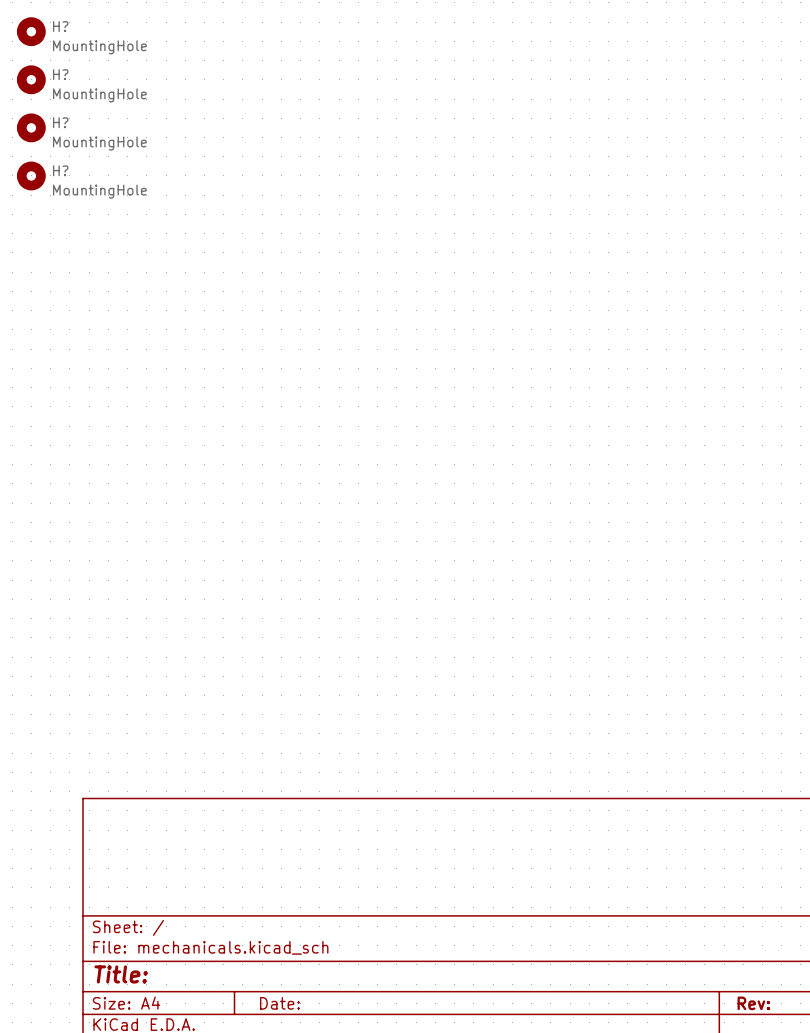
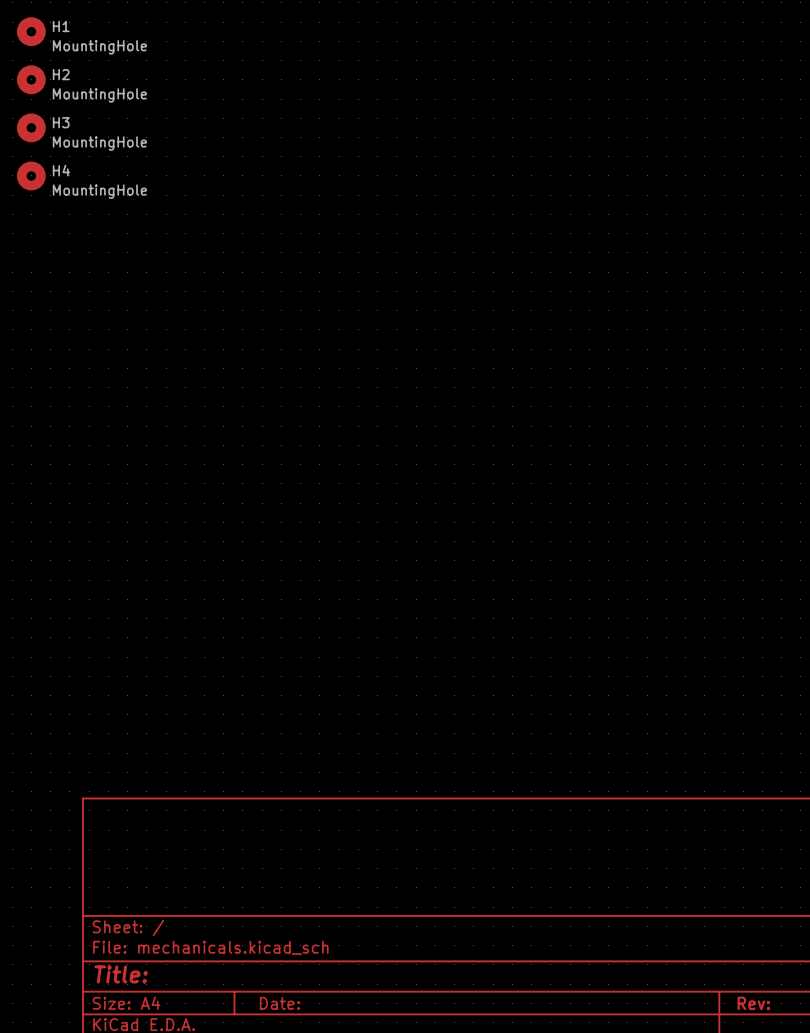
H? name: H? (60, 26) -> H1 (61, 26)
H? name: H? (60, 74) -> H2 (61, 74)
H? name: H? (60, 122) -> H3 (61, 122)
H? name: H? (60, 170) -> H4 (61, 170)

